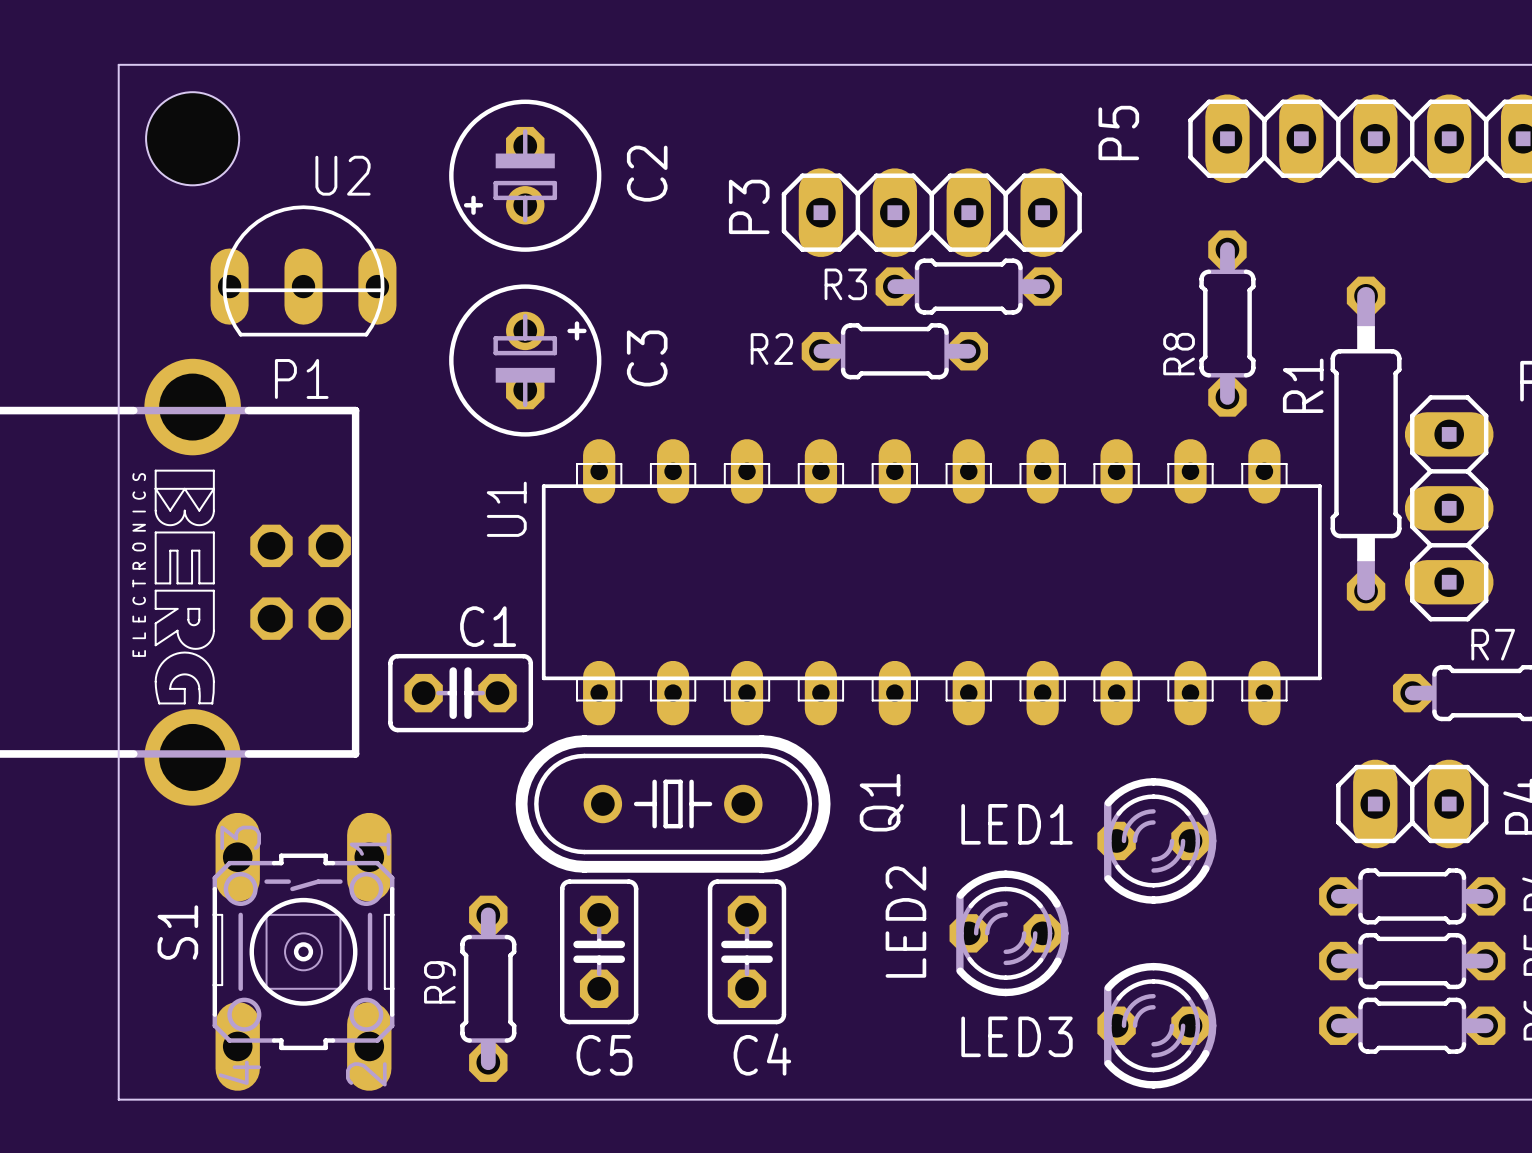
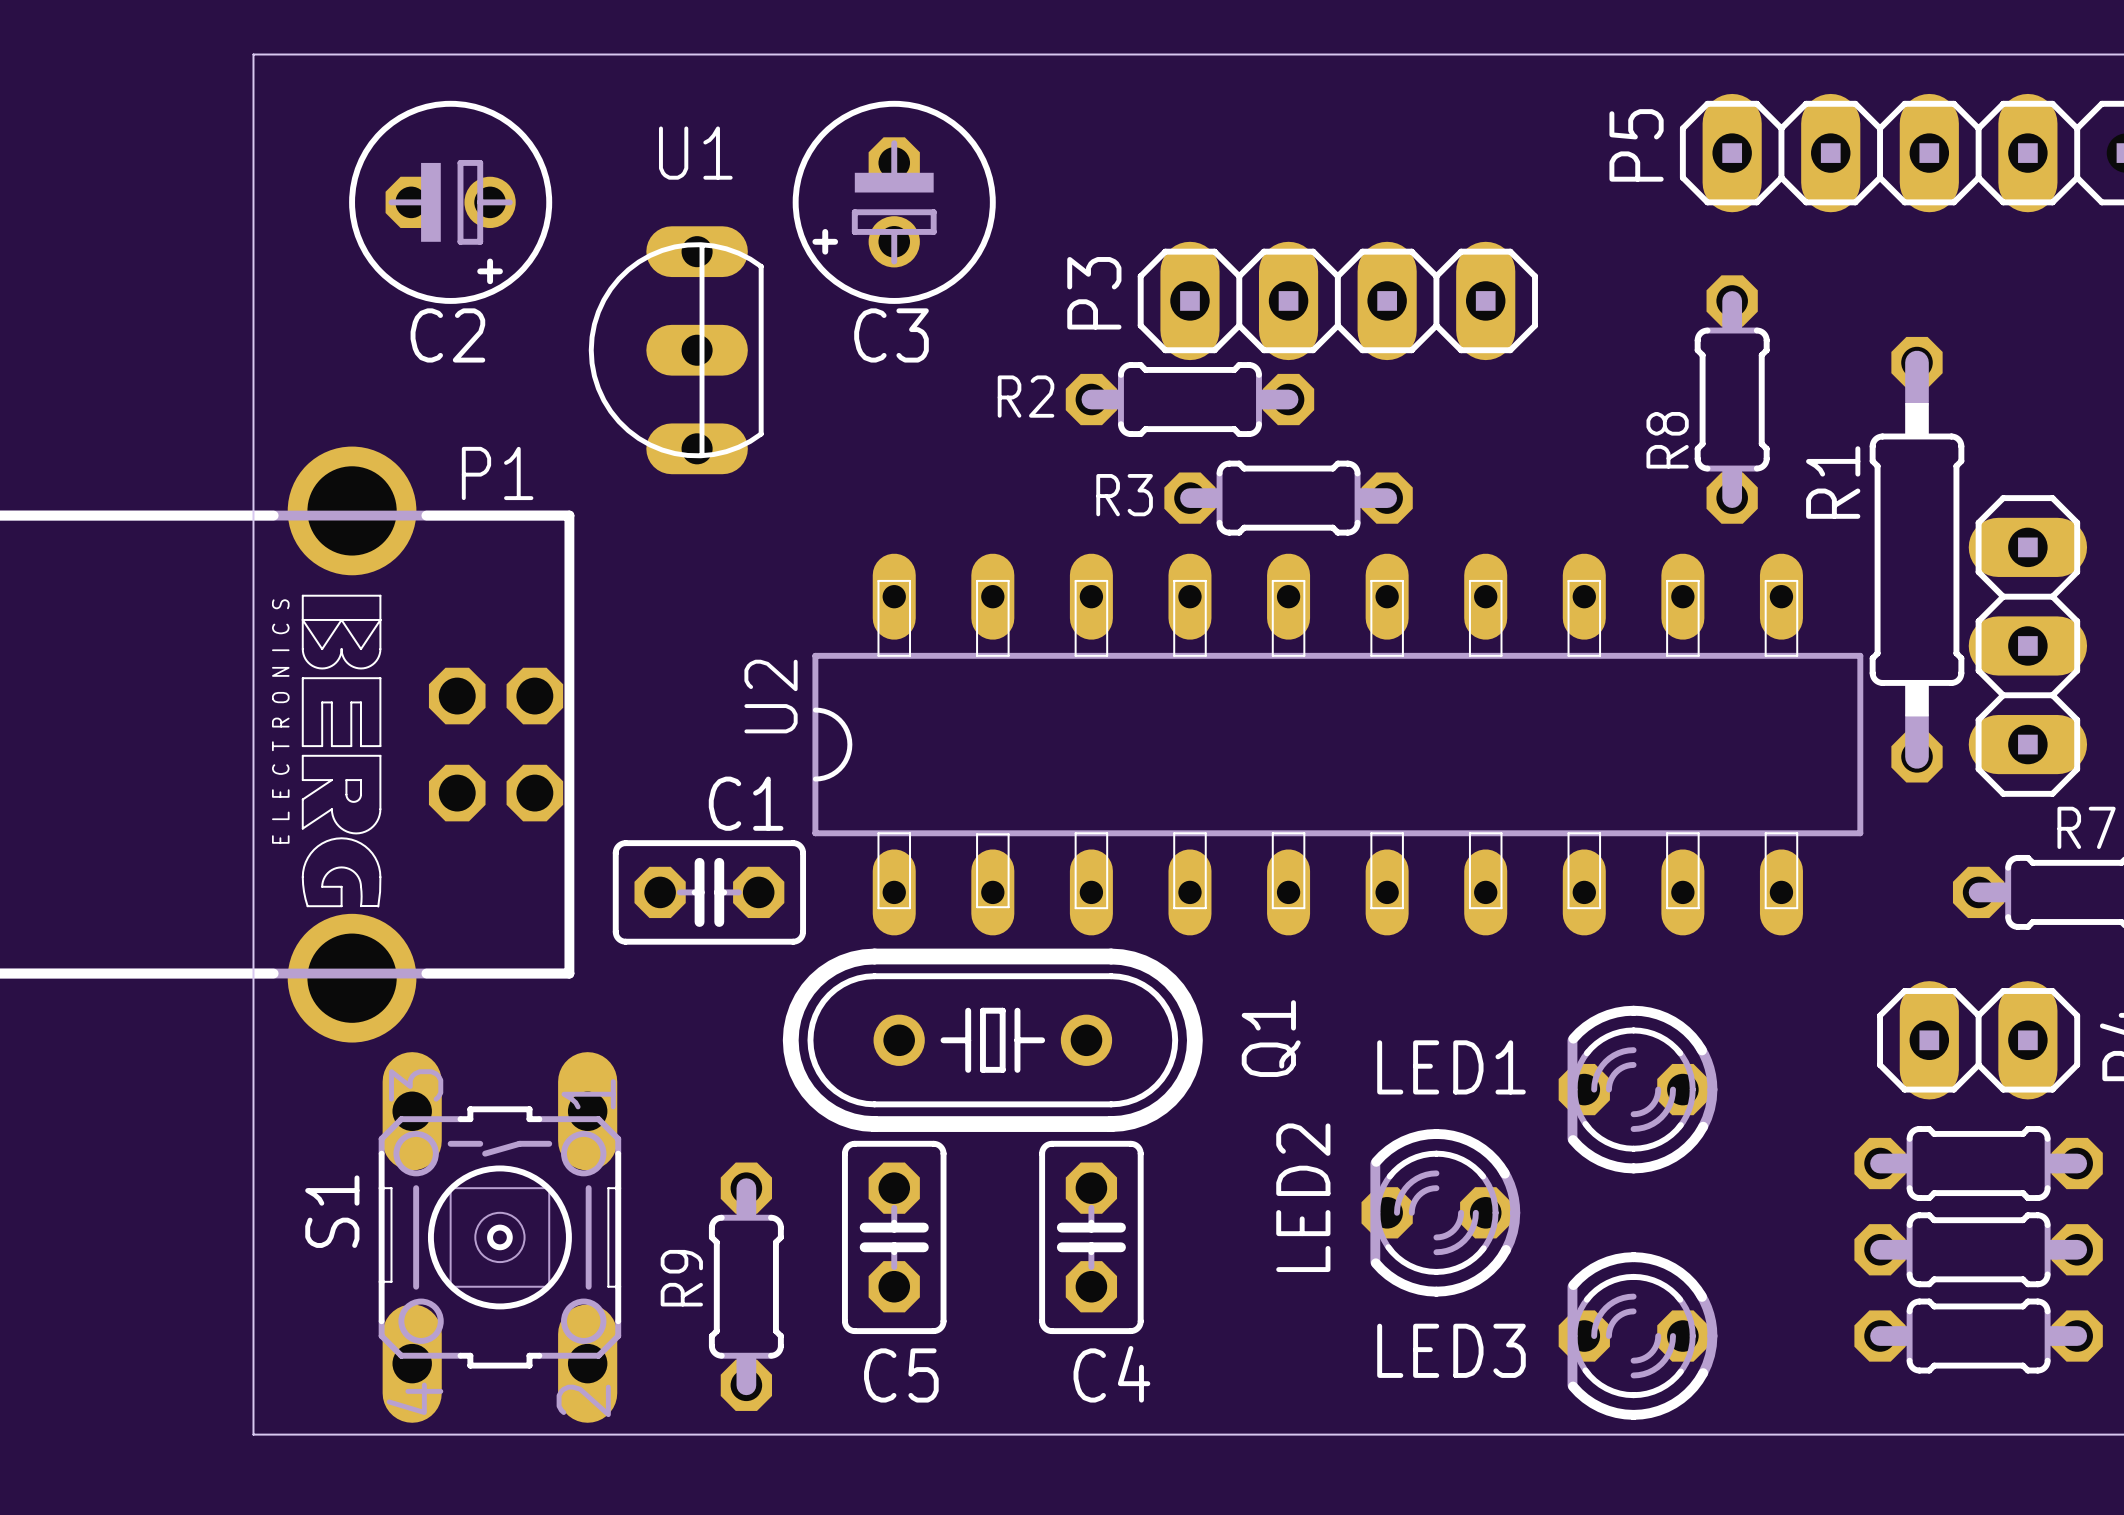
P5 name position: P5 (1118, 132) -> P5 (1636, 145)
hole: (192, 138) -> none
C2 name position: C2 (647, 173) -> C2 (447, 335)
U2 name position: U2 (343, 175) -> U2 (771, 696)
C2 rotation: 0° (525, 175) -> 90° counterclockwise (450, 202)
C2 position: (525, 175) -> (450, 202)
U2 footprint: [210, 205, 397, 337] -> [812, 553, 1864, 936]
P3 position: (931, 212) -> (1337, 300)
R3 position: (968, 286) -> (1288, 498)
R2 position: (894, 351) -> (1189, 399)
C3 name position: C3 (647, 358) -> C3 (891, 335)
C3 rotation: 0° (525, 360) -> 180° (894, 202)
C3 position: (525, 360) -> (894, 202)
U1 footprint: [541, 439, 1322, 726] -> [588, 226, 764, 475]
U1 name position: U1 (506, 509) -> U1 (695, 153)

